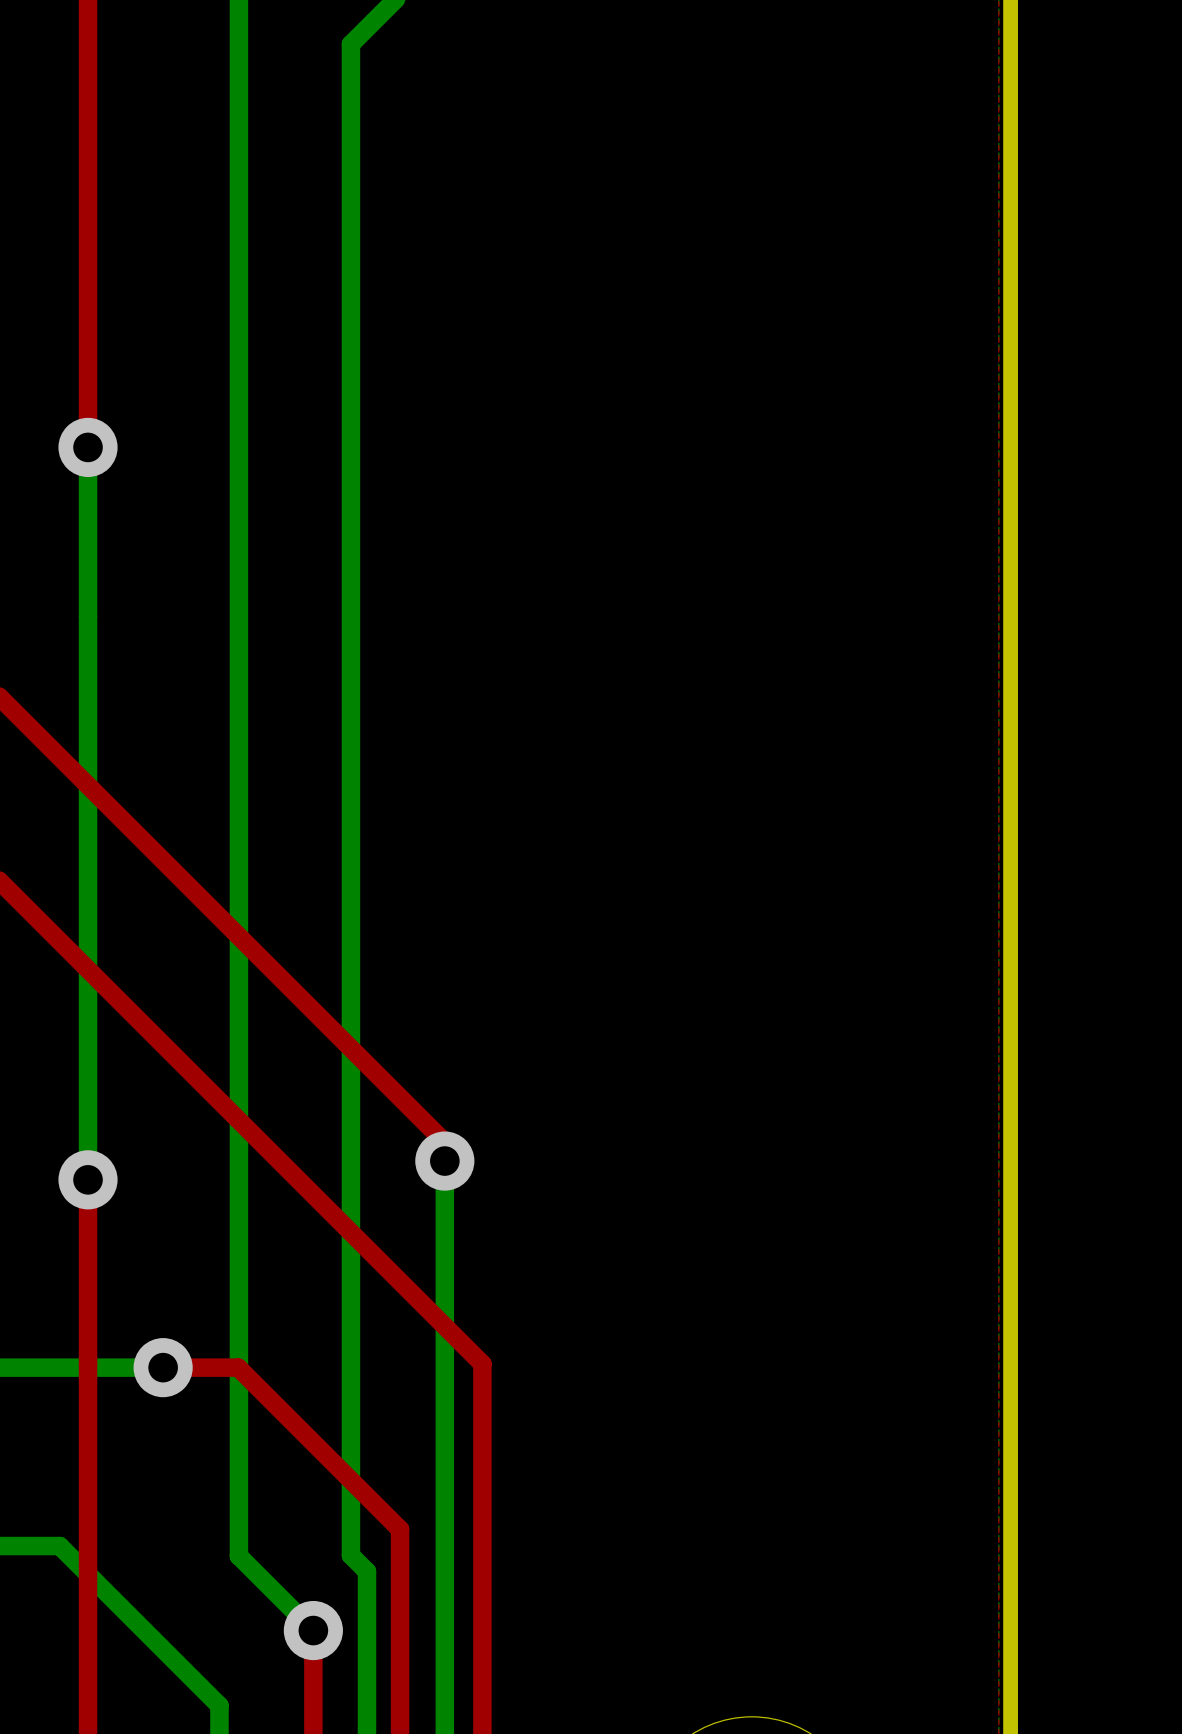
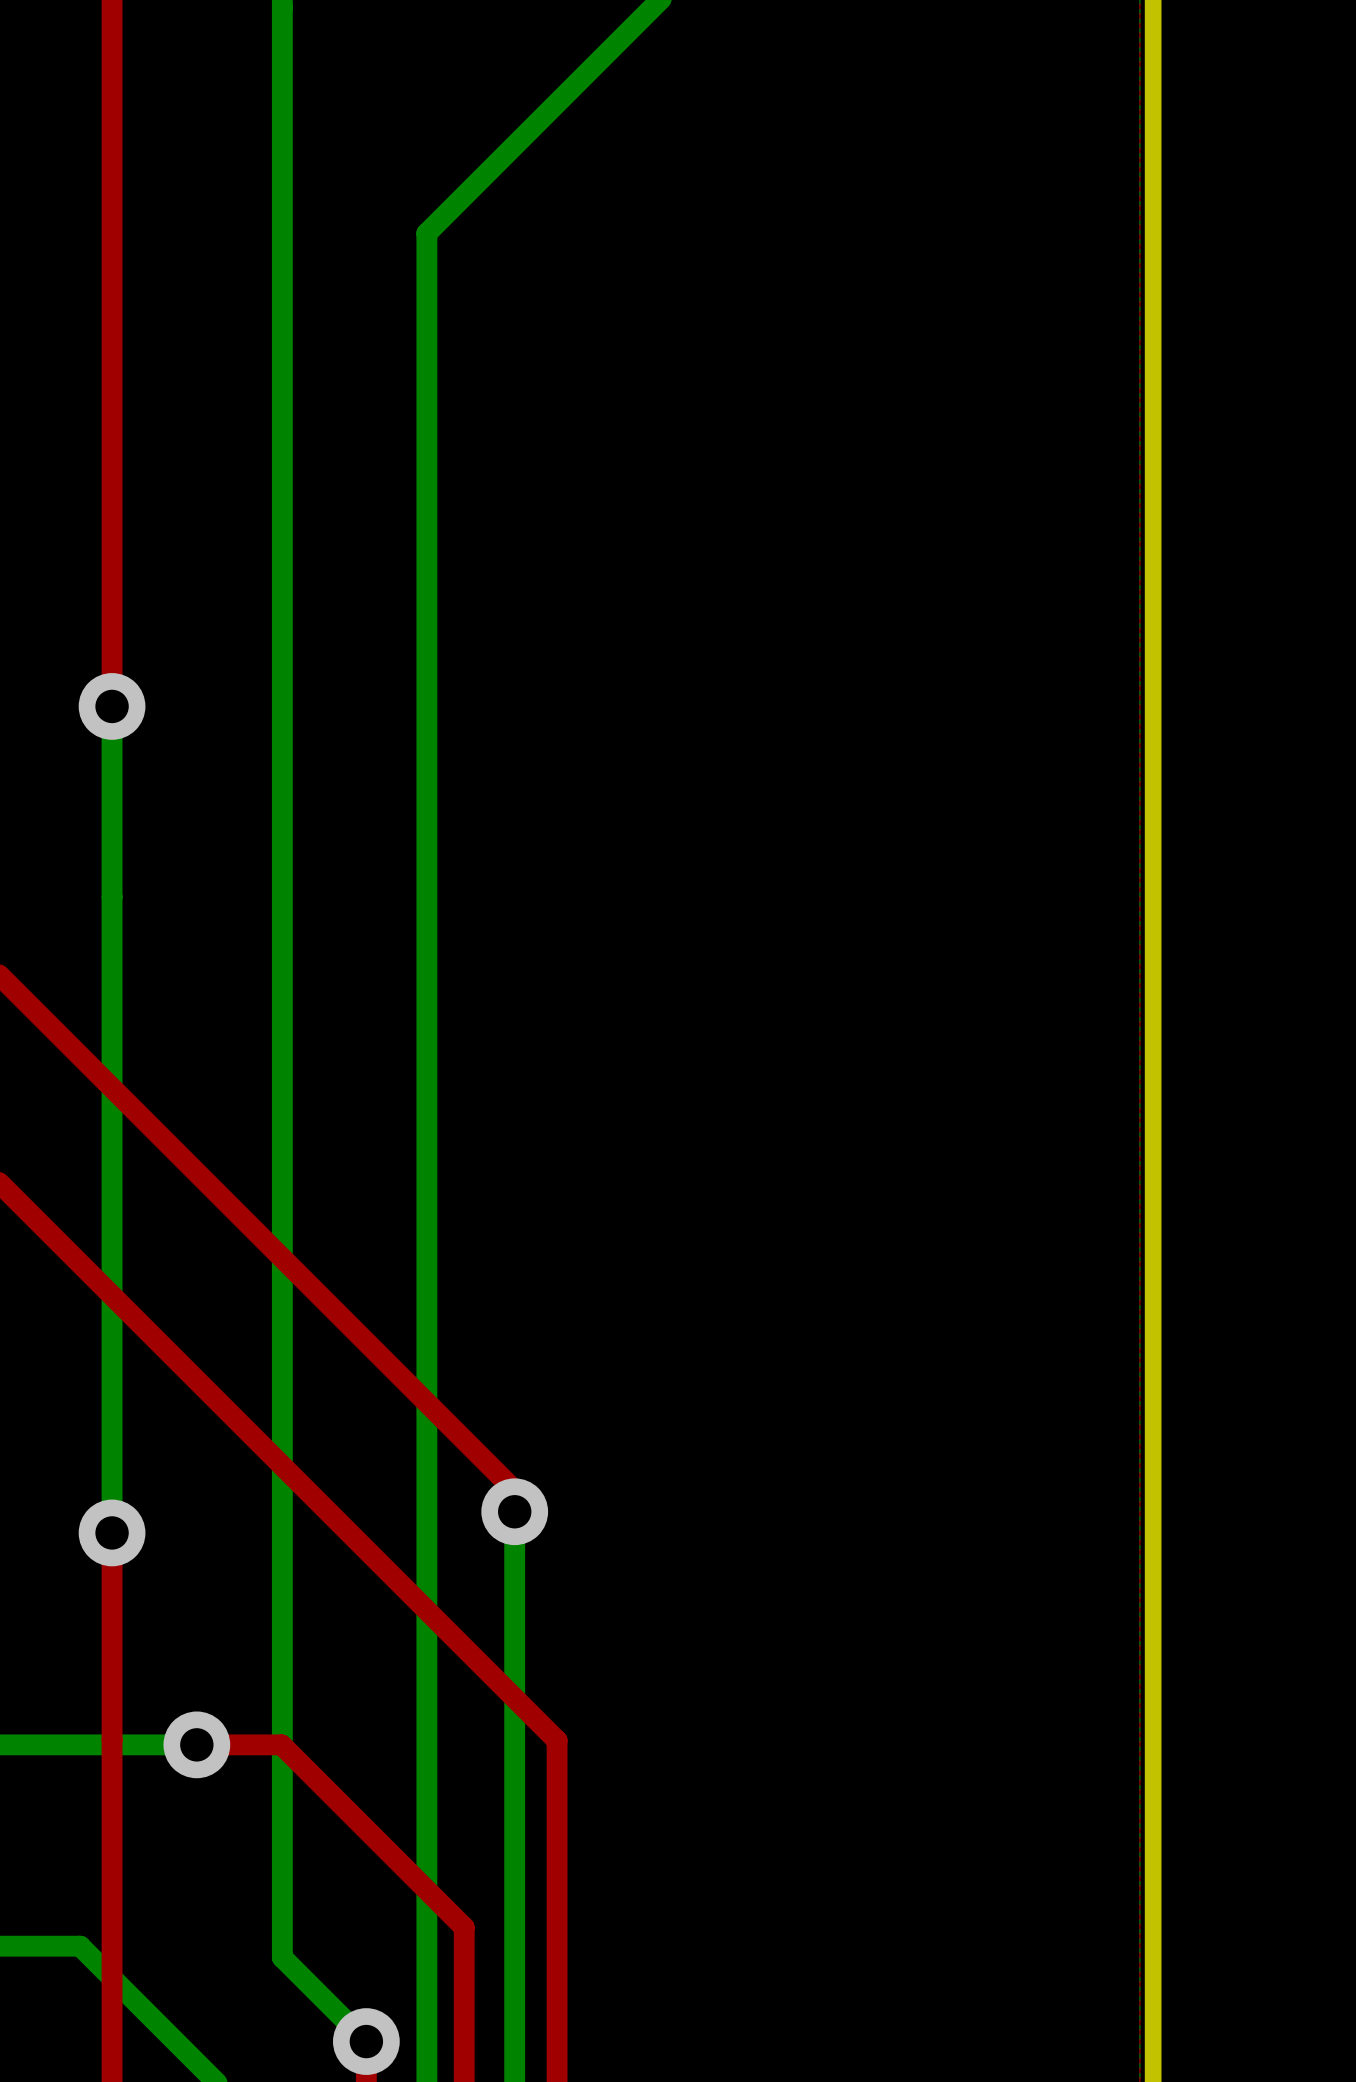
bottom track: (366, 28) (350, 44) (350, 1555) (366, 1571) -> (426, 233) (426, 1974)

